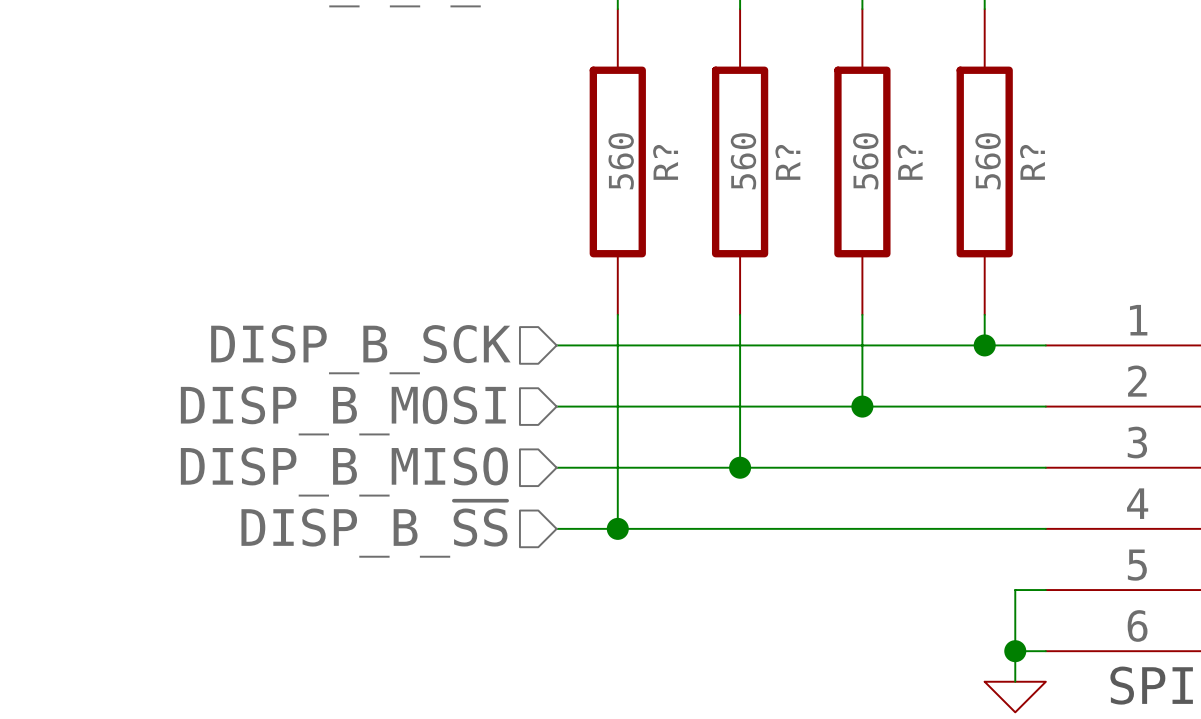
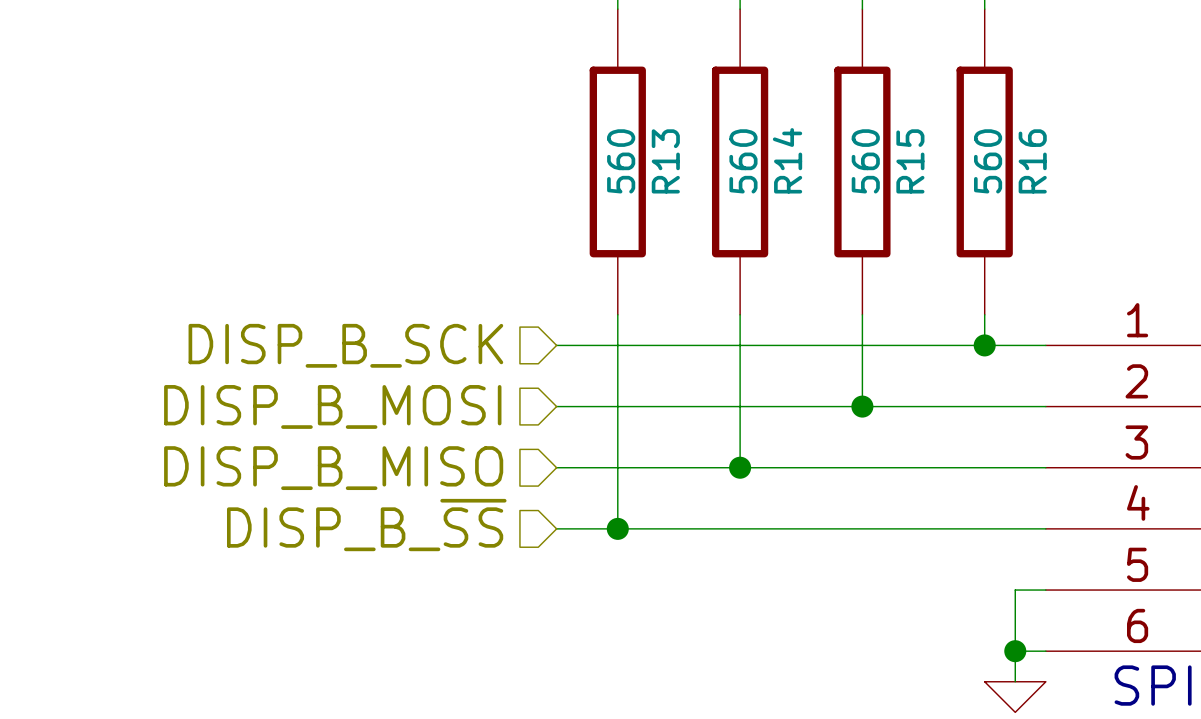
R? name: R? (665, 162) -> R13 (665, 161)
R? name: R? (787, 162) -> R14 (787, 160)
R? name: R? (910, 162) -> R15 (910, 161)
R? name: R? (1032, 162) -> R16 (1032, 161)

